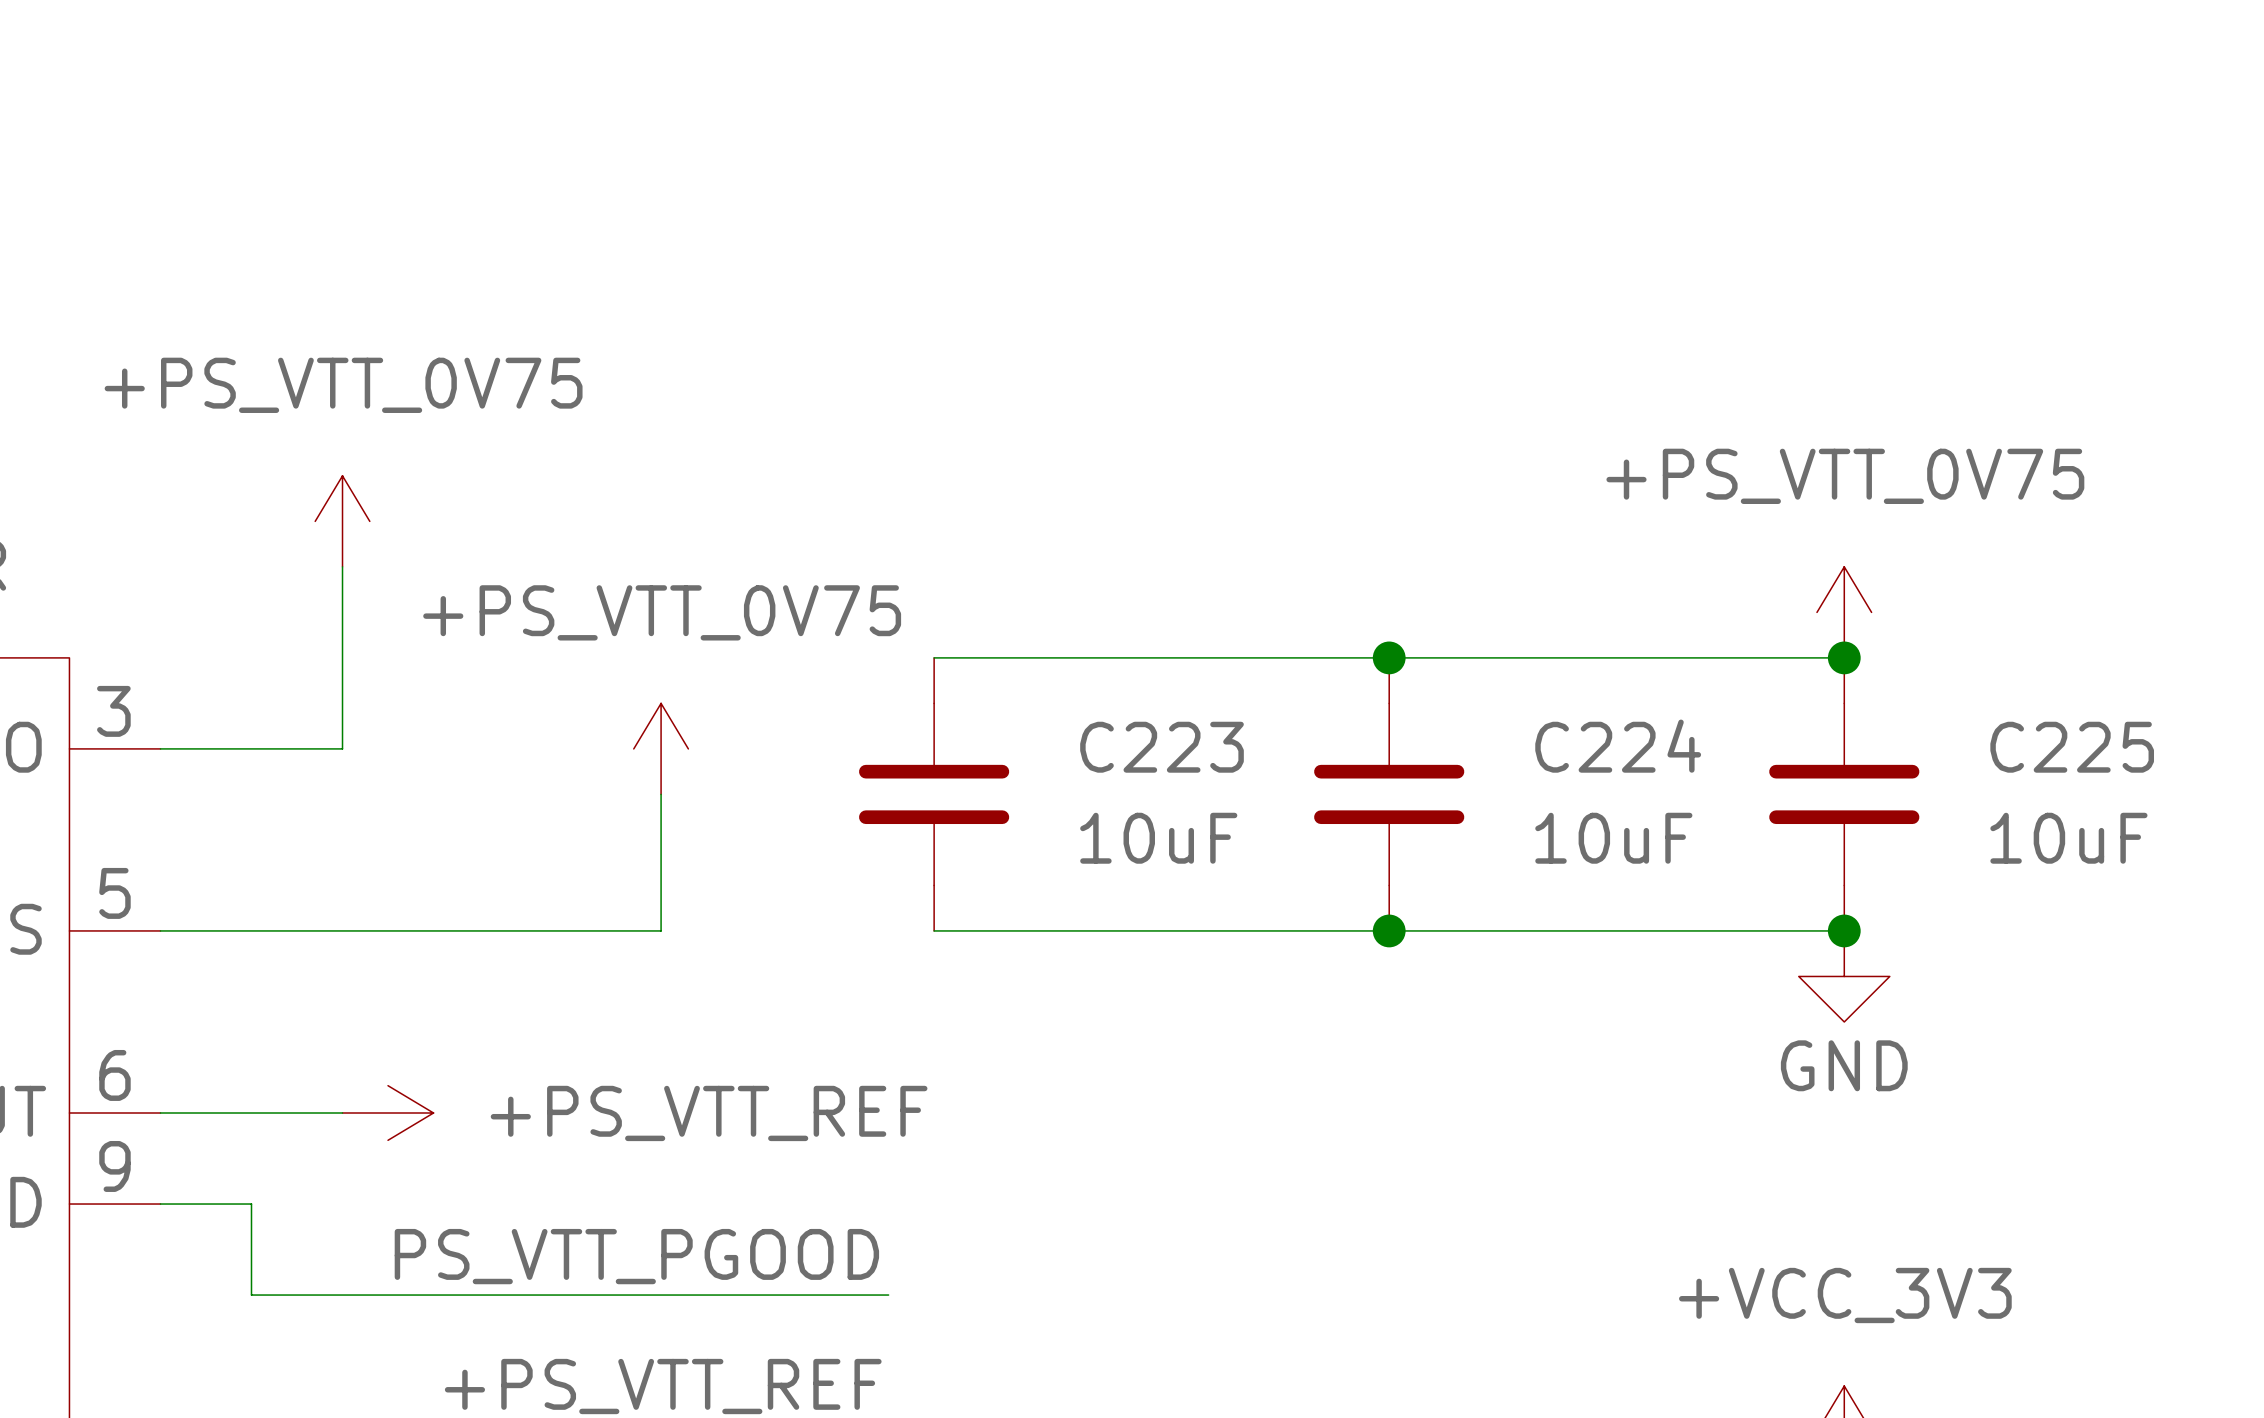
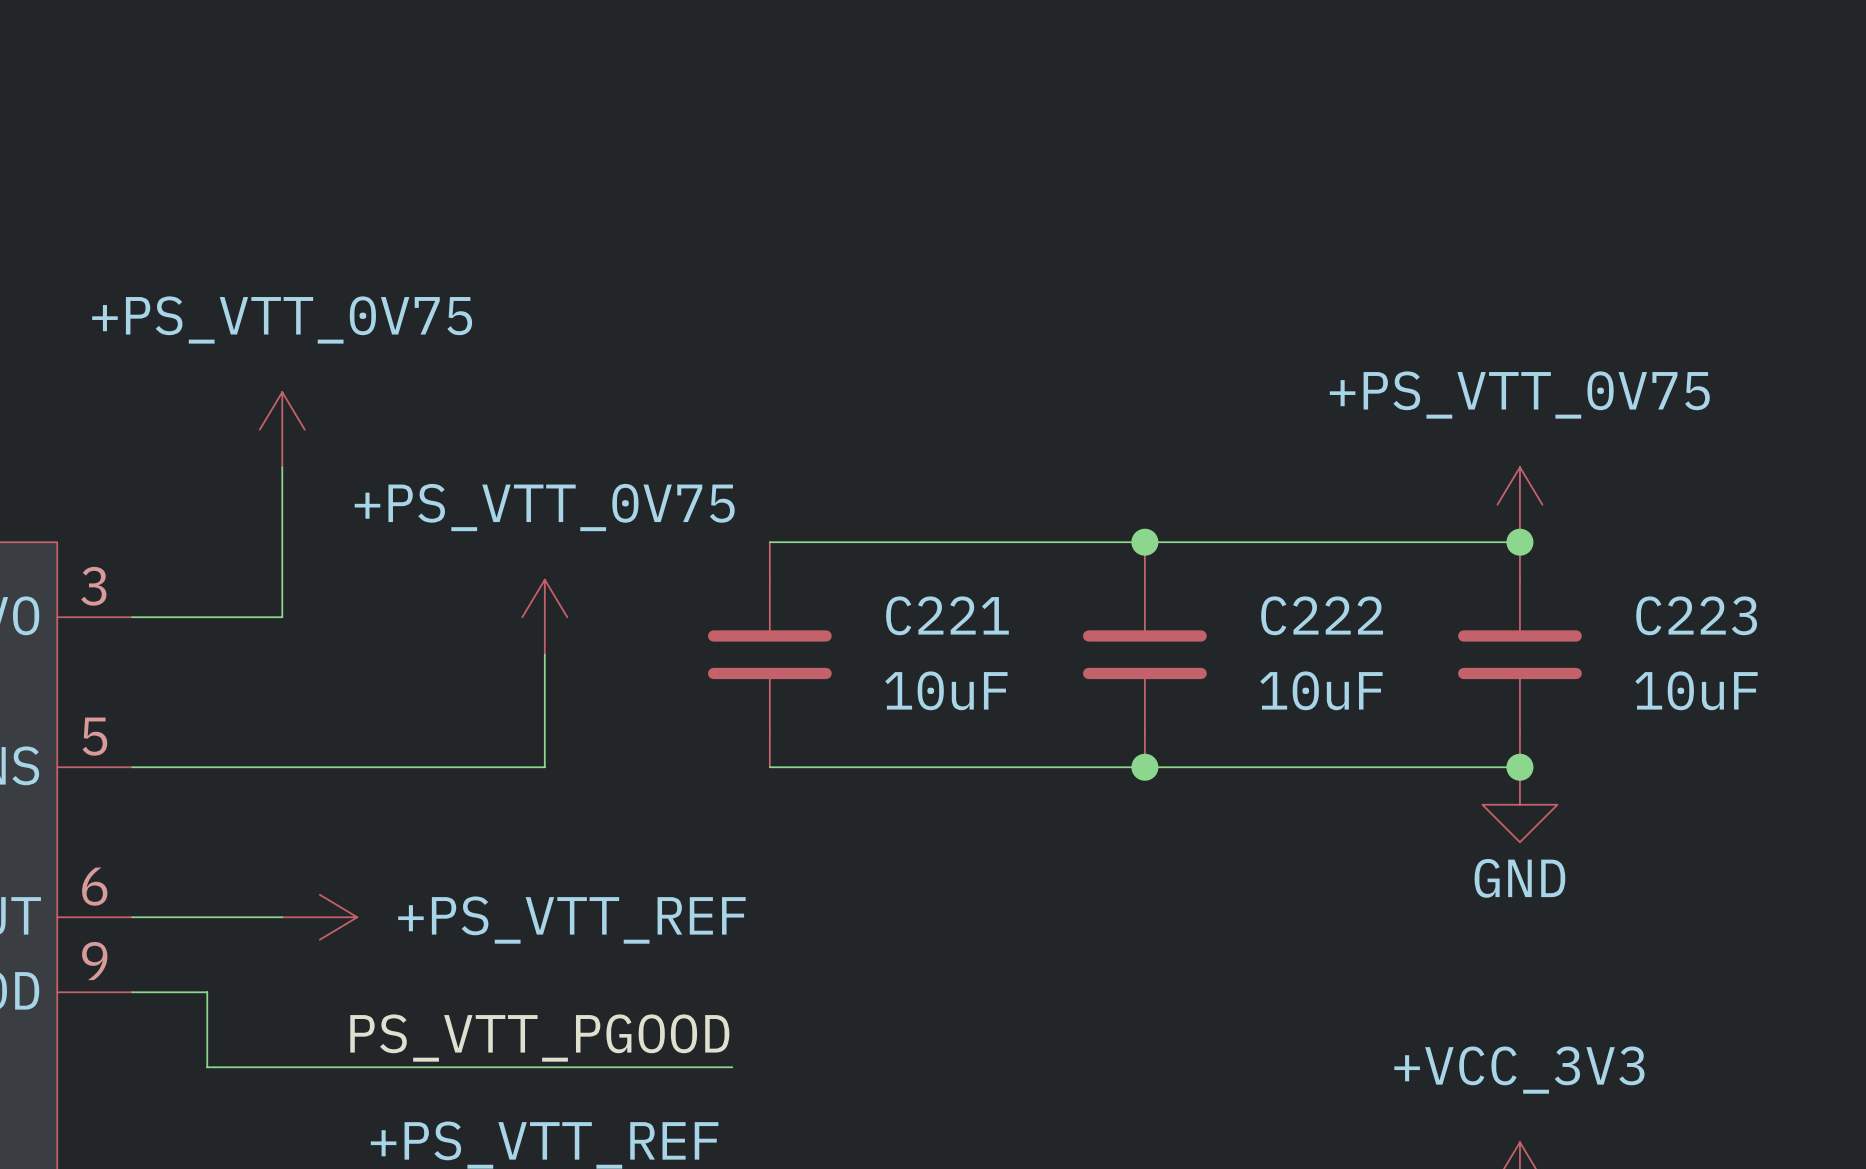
C224 name: C224 (1618, 746) -> C222 (1322, 615)
C223 name: C223 (1162, 747) -> C221 (947, 615)
C225 name: C225 (2072, 747) -> C223 (1696, 615)

